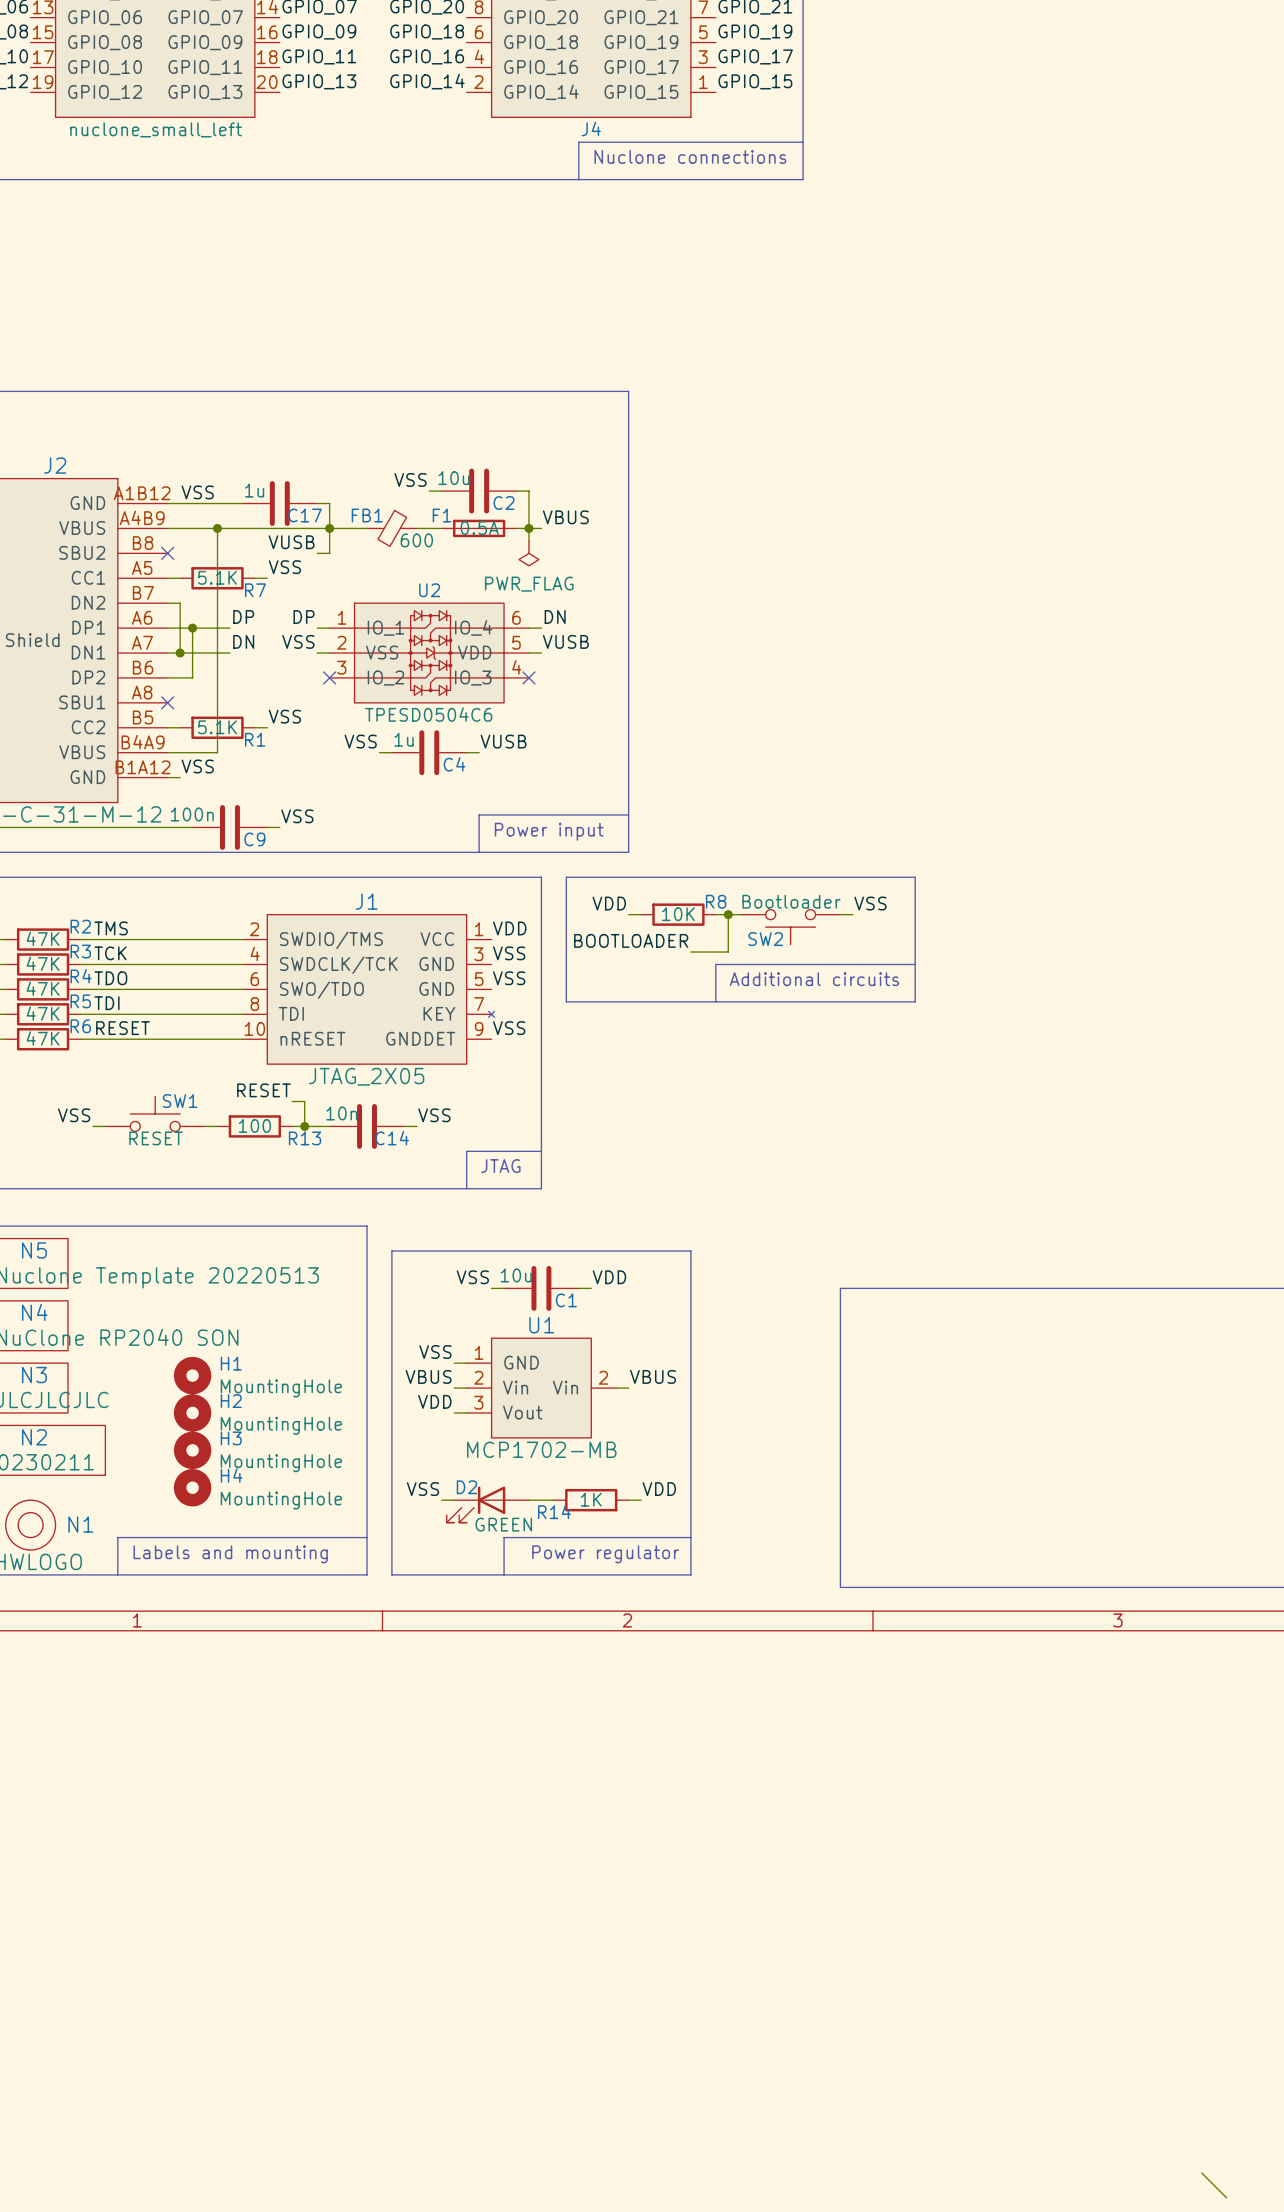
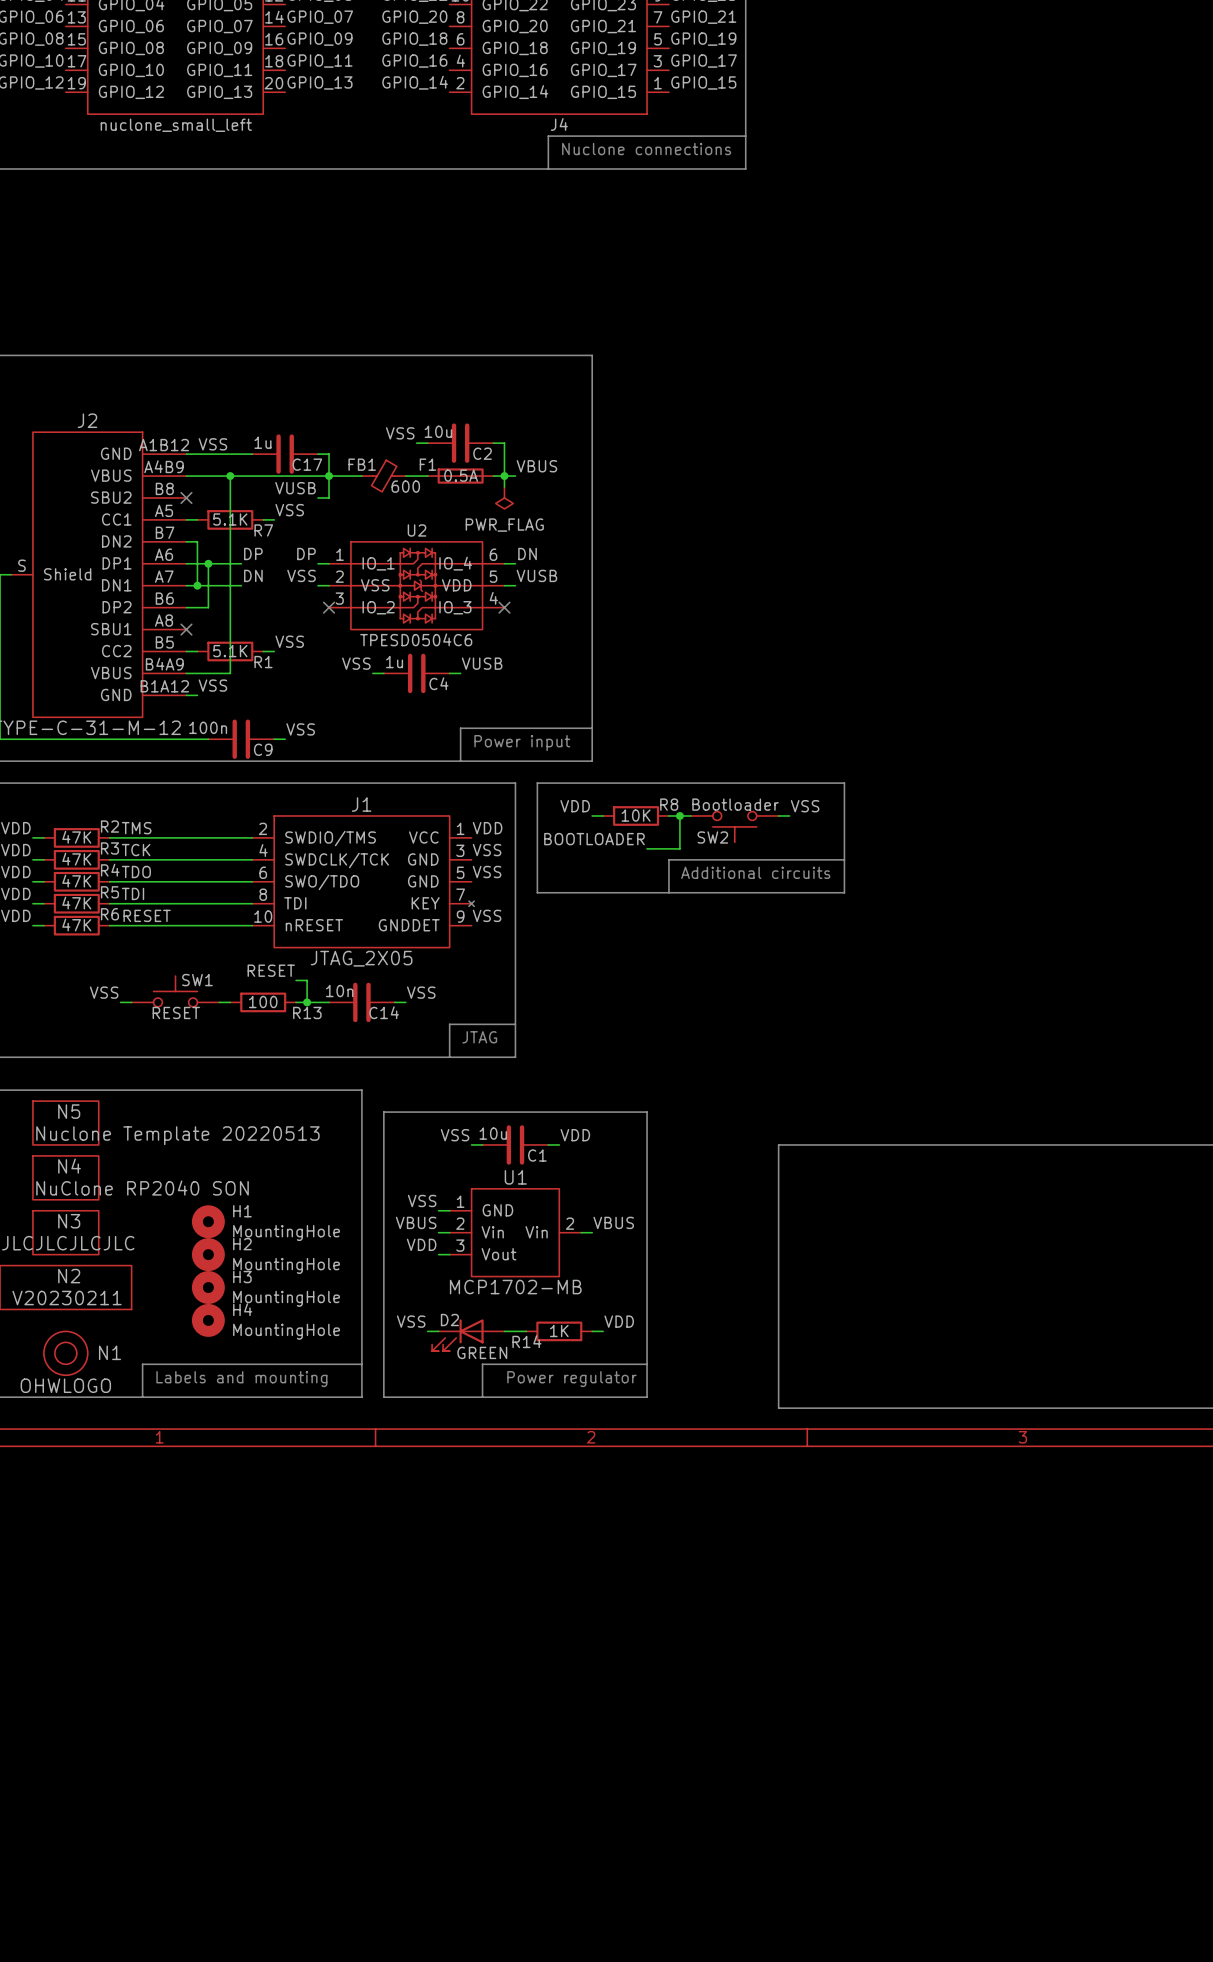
wire: (1201, 2172) (1226, 2197) -> none

